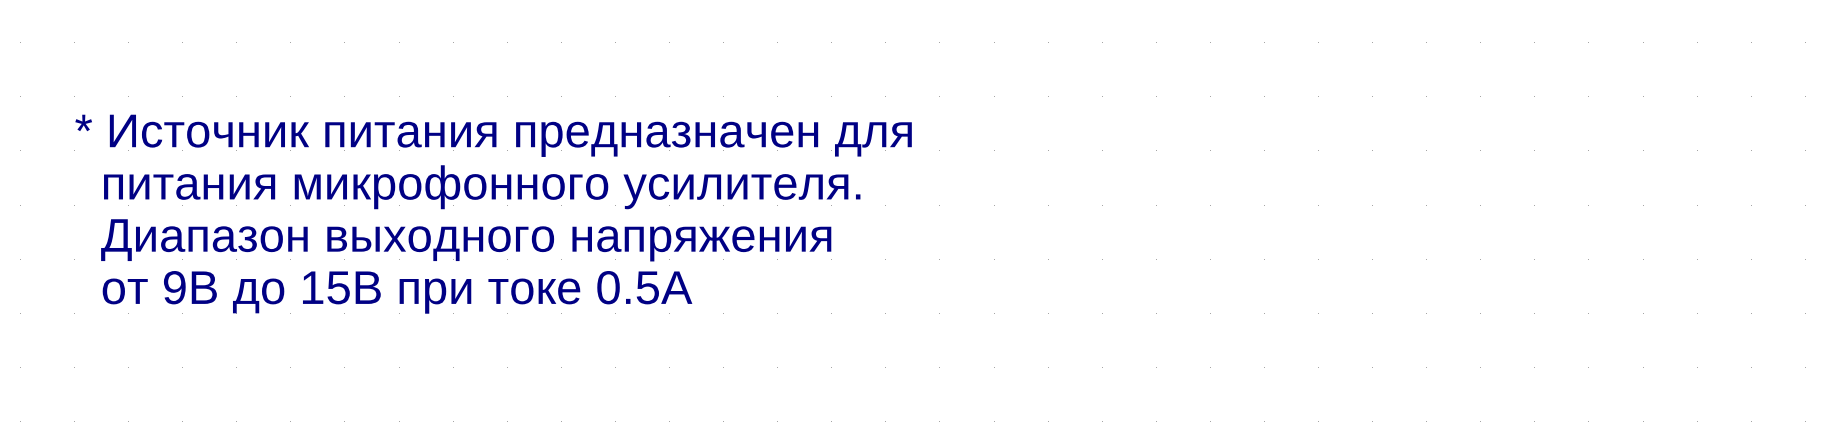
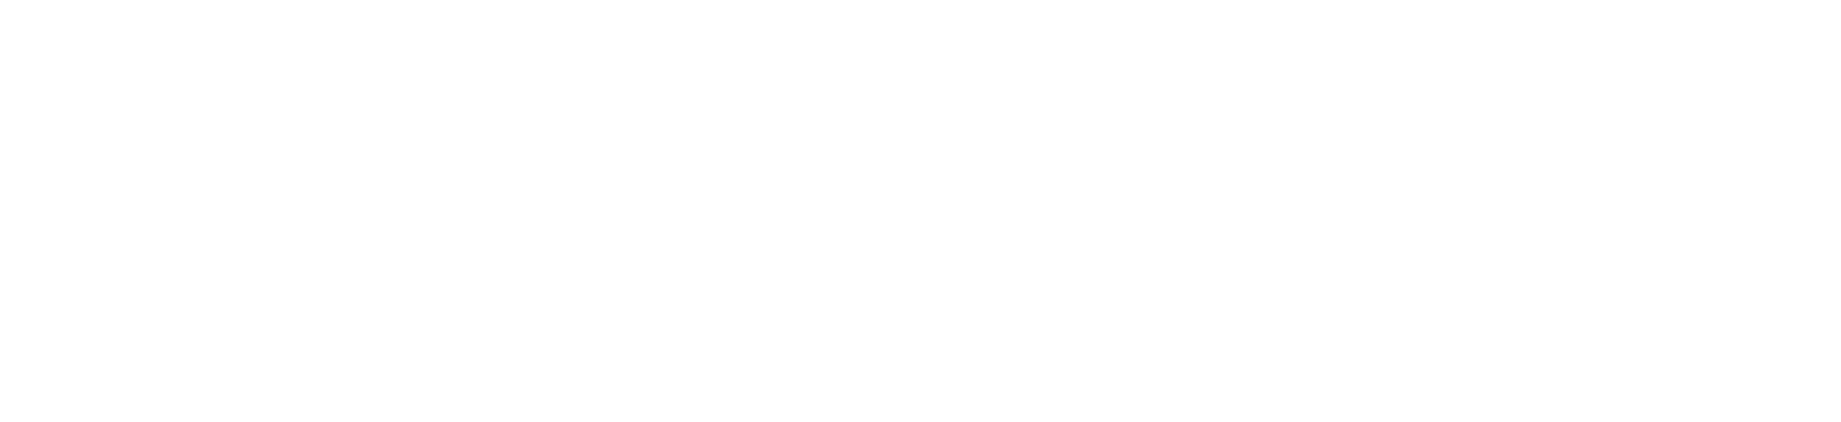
text: * Источник питания предназначен для (493, 135) -> none
text: питания микрофонного усилителя. (482, 187) -> none
text: Диапазон выходного напряжения (466, 240) -> none
text: от 9В до 15В при токе 0.5А (397, 292) -> none

